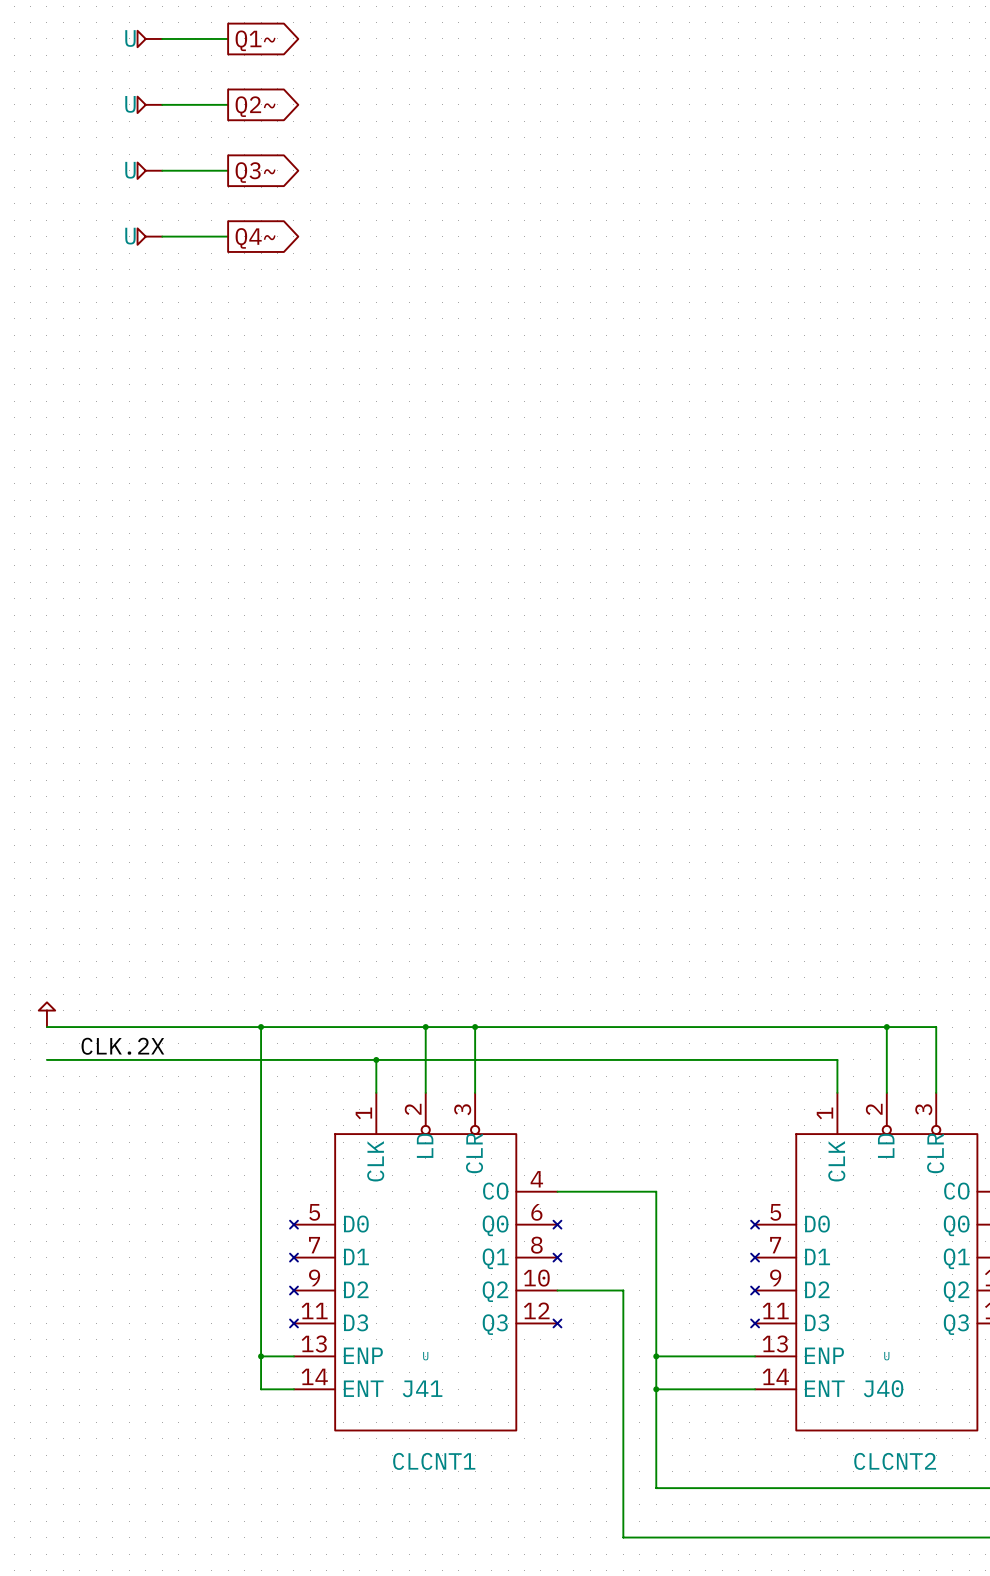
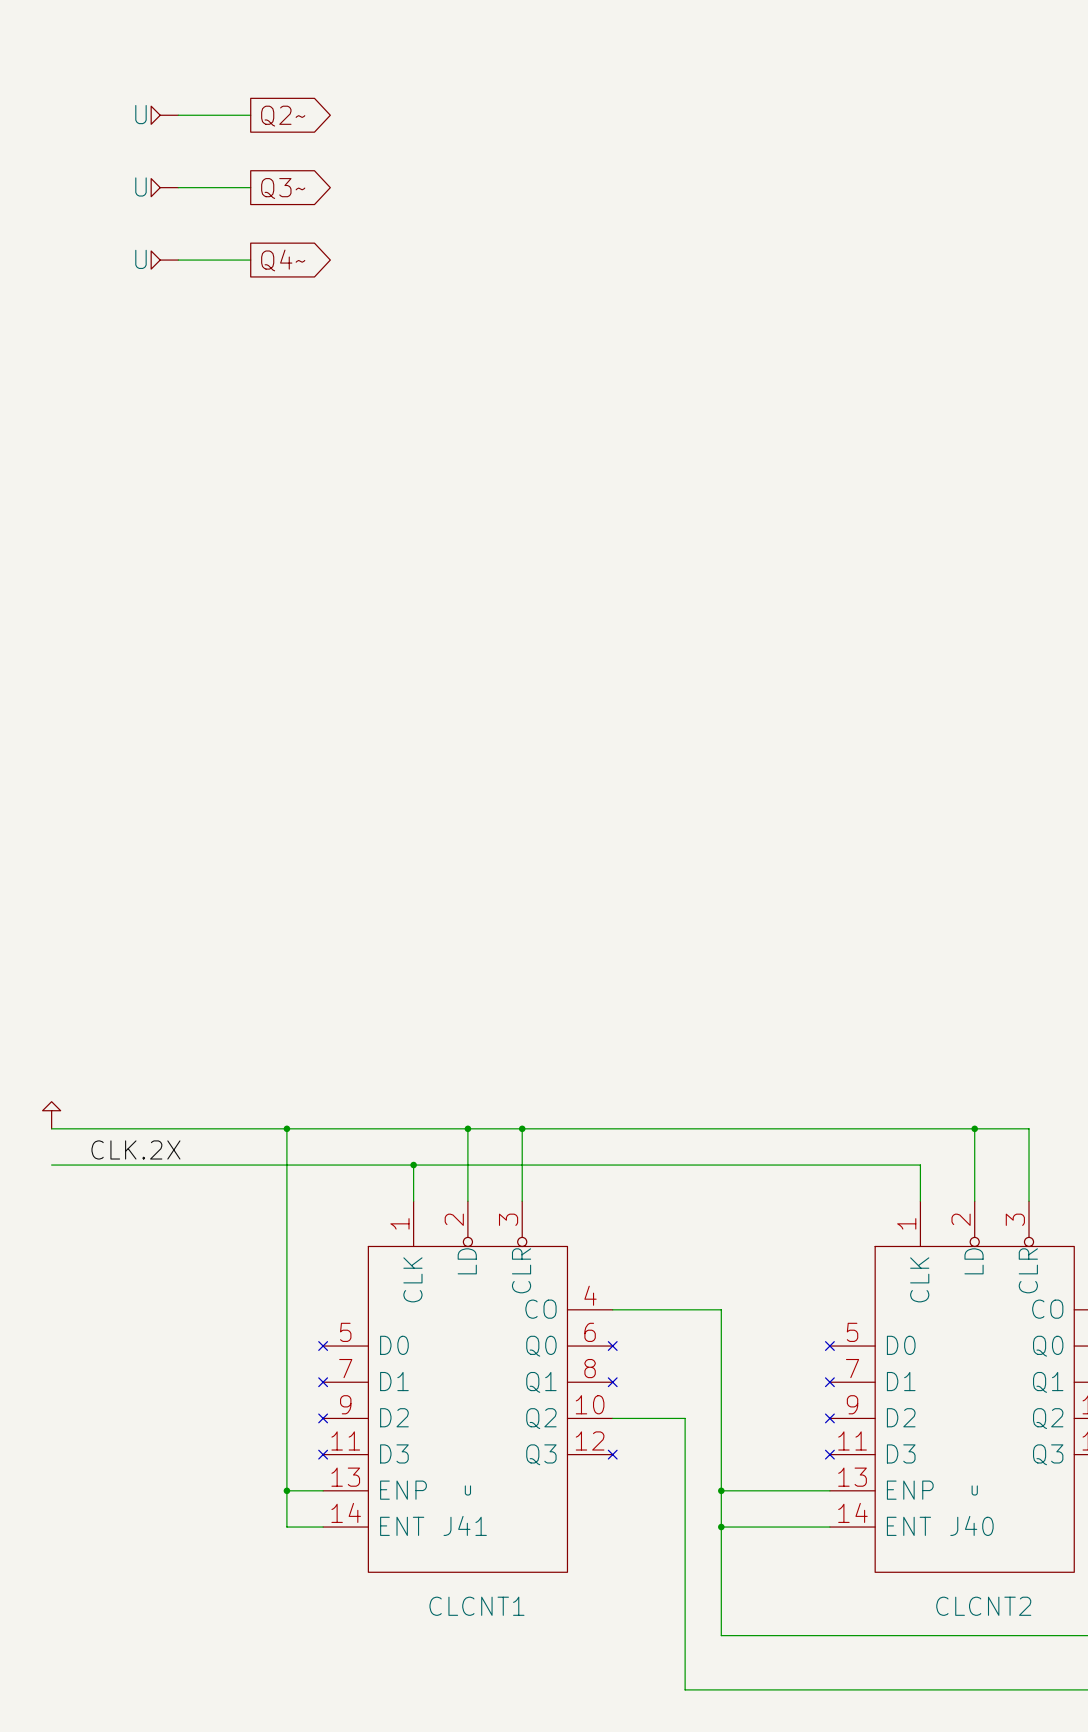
U: (149, 38) -> none
wire: (162, 38) (228, 38) -> none
global label: Q1~ (255, 40) -> none

